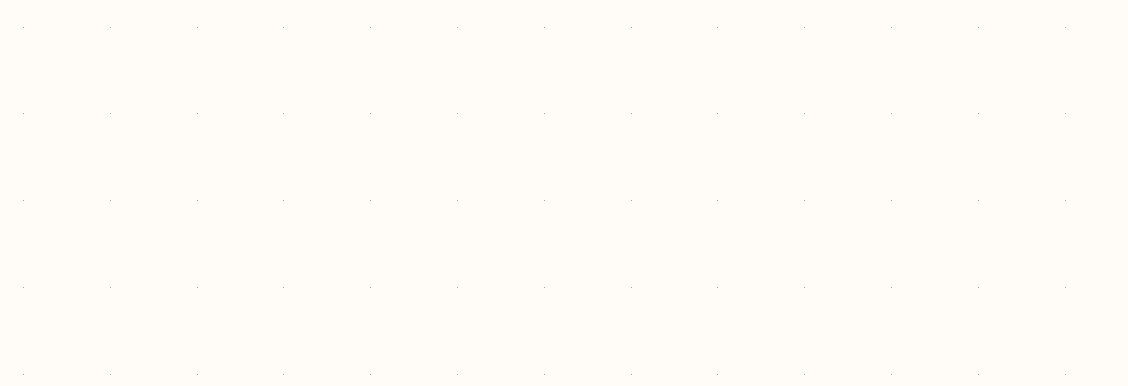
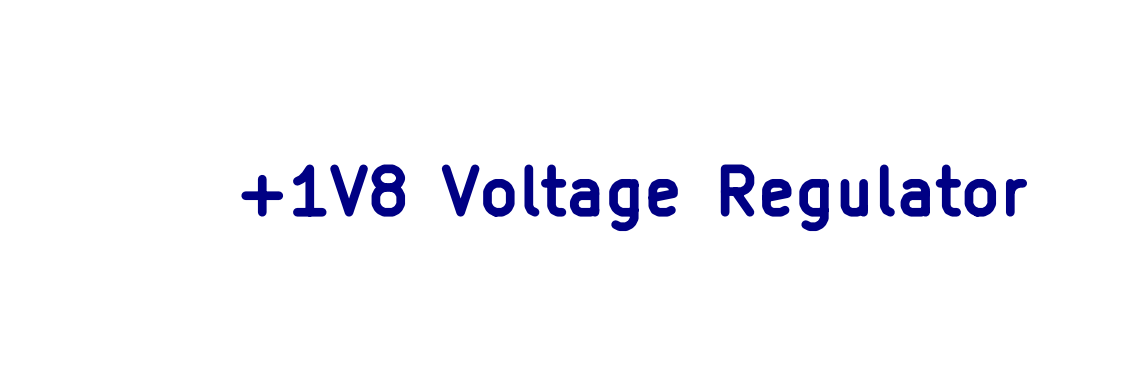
text: none -> +1V8 Voltage Regulator (634, 197)

